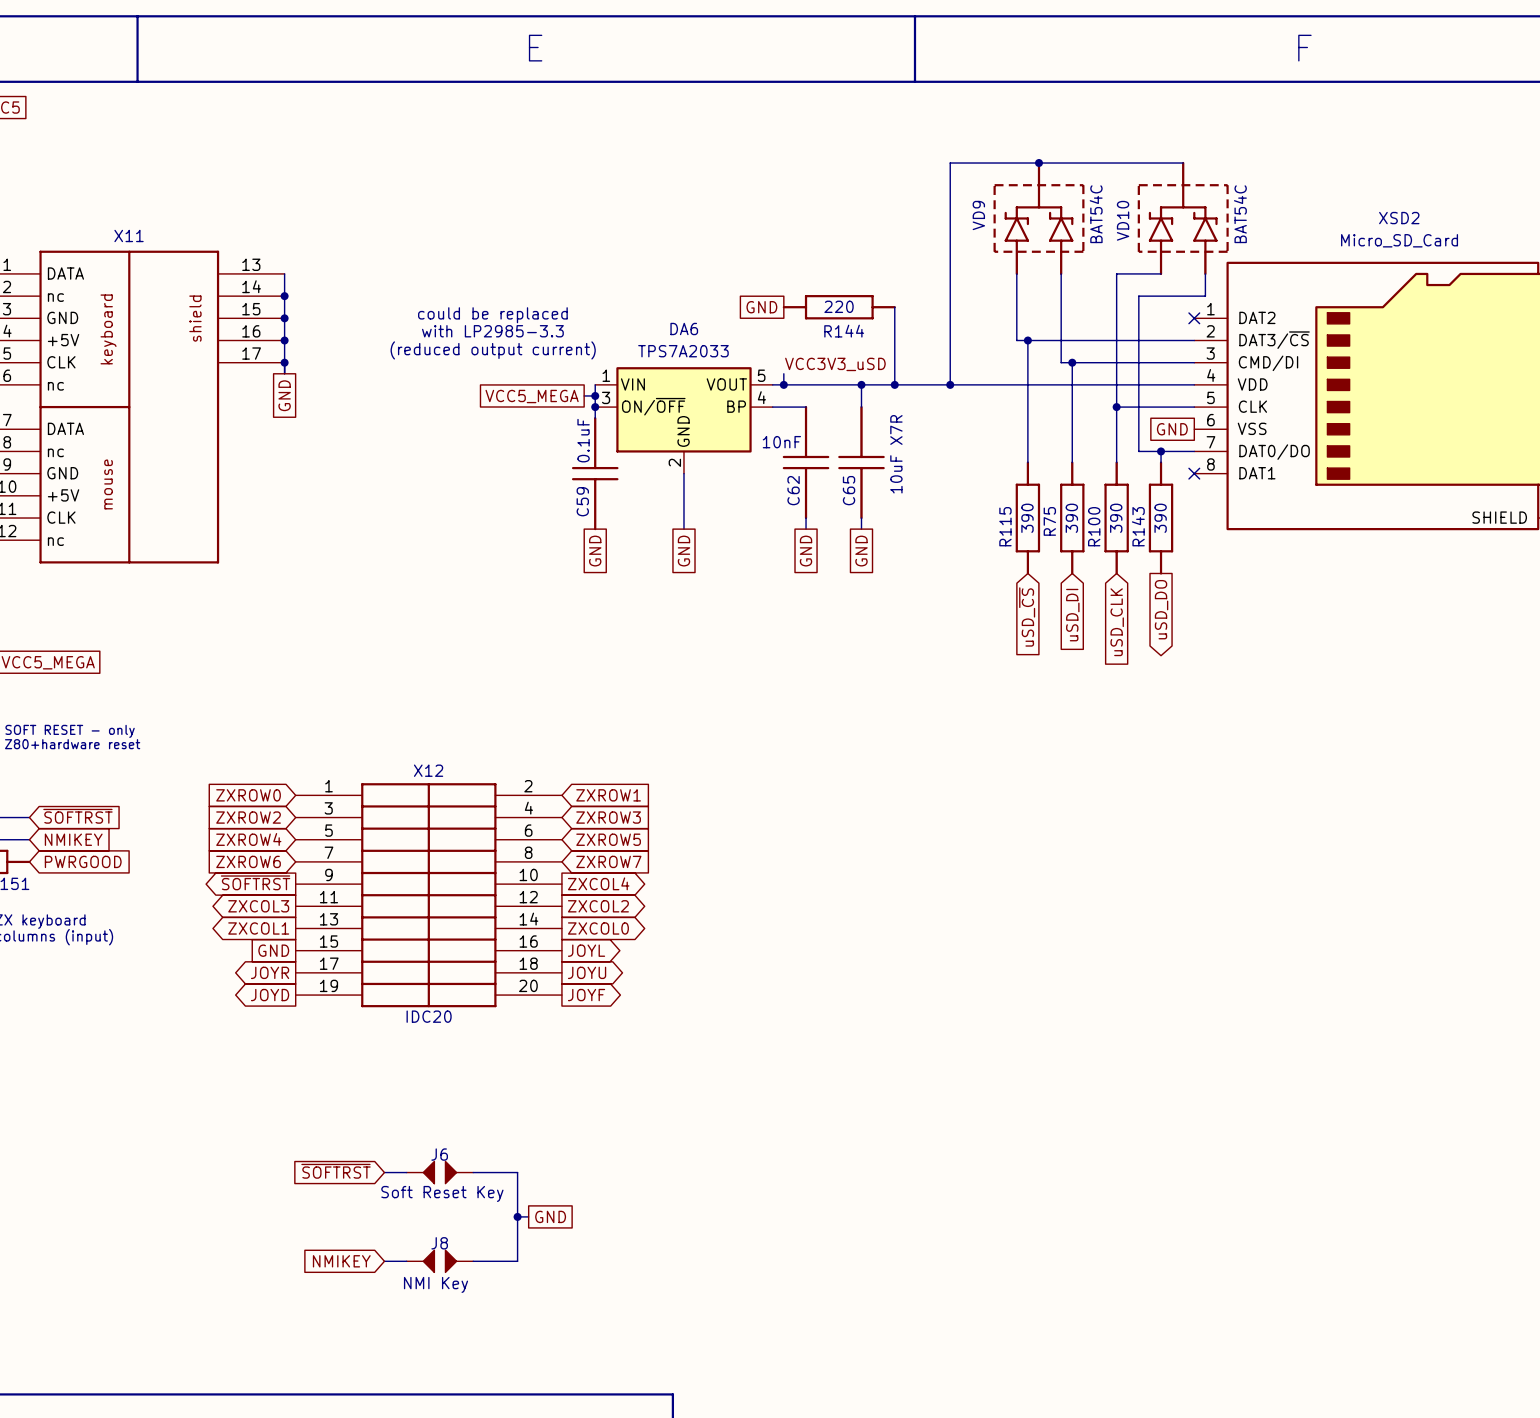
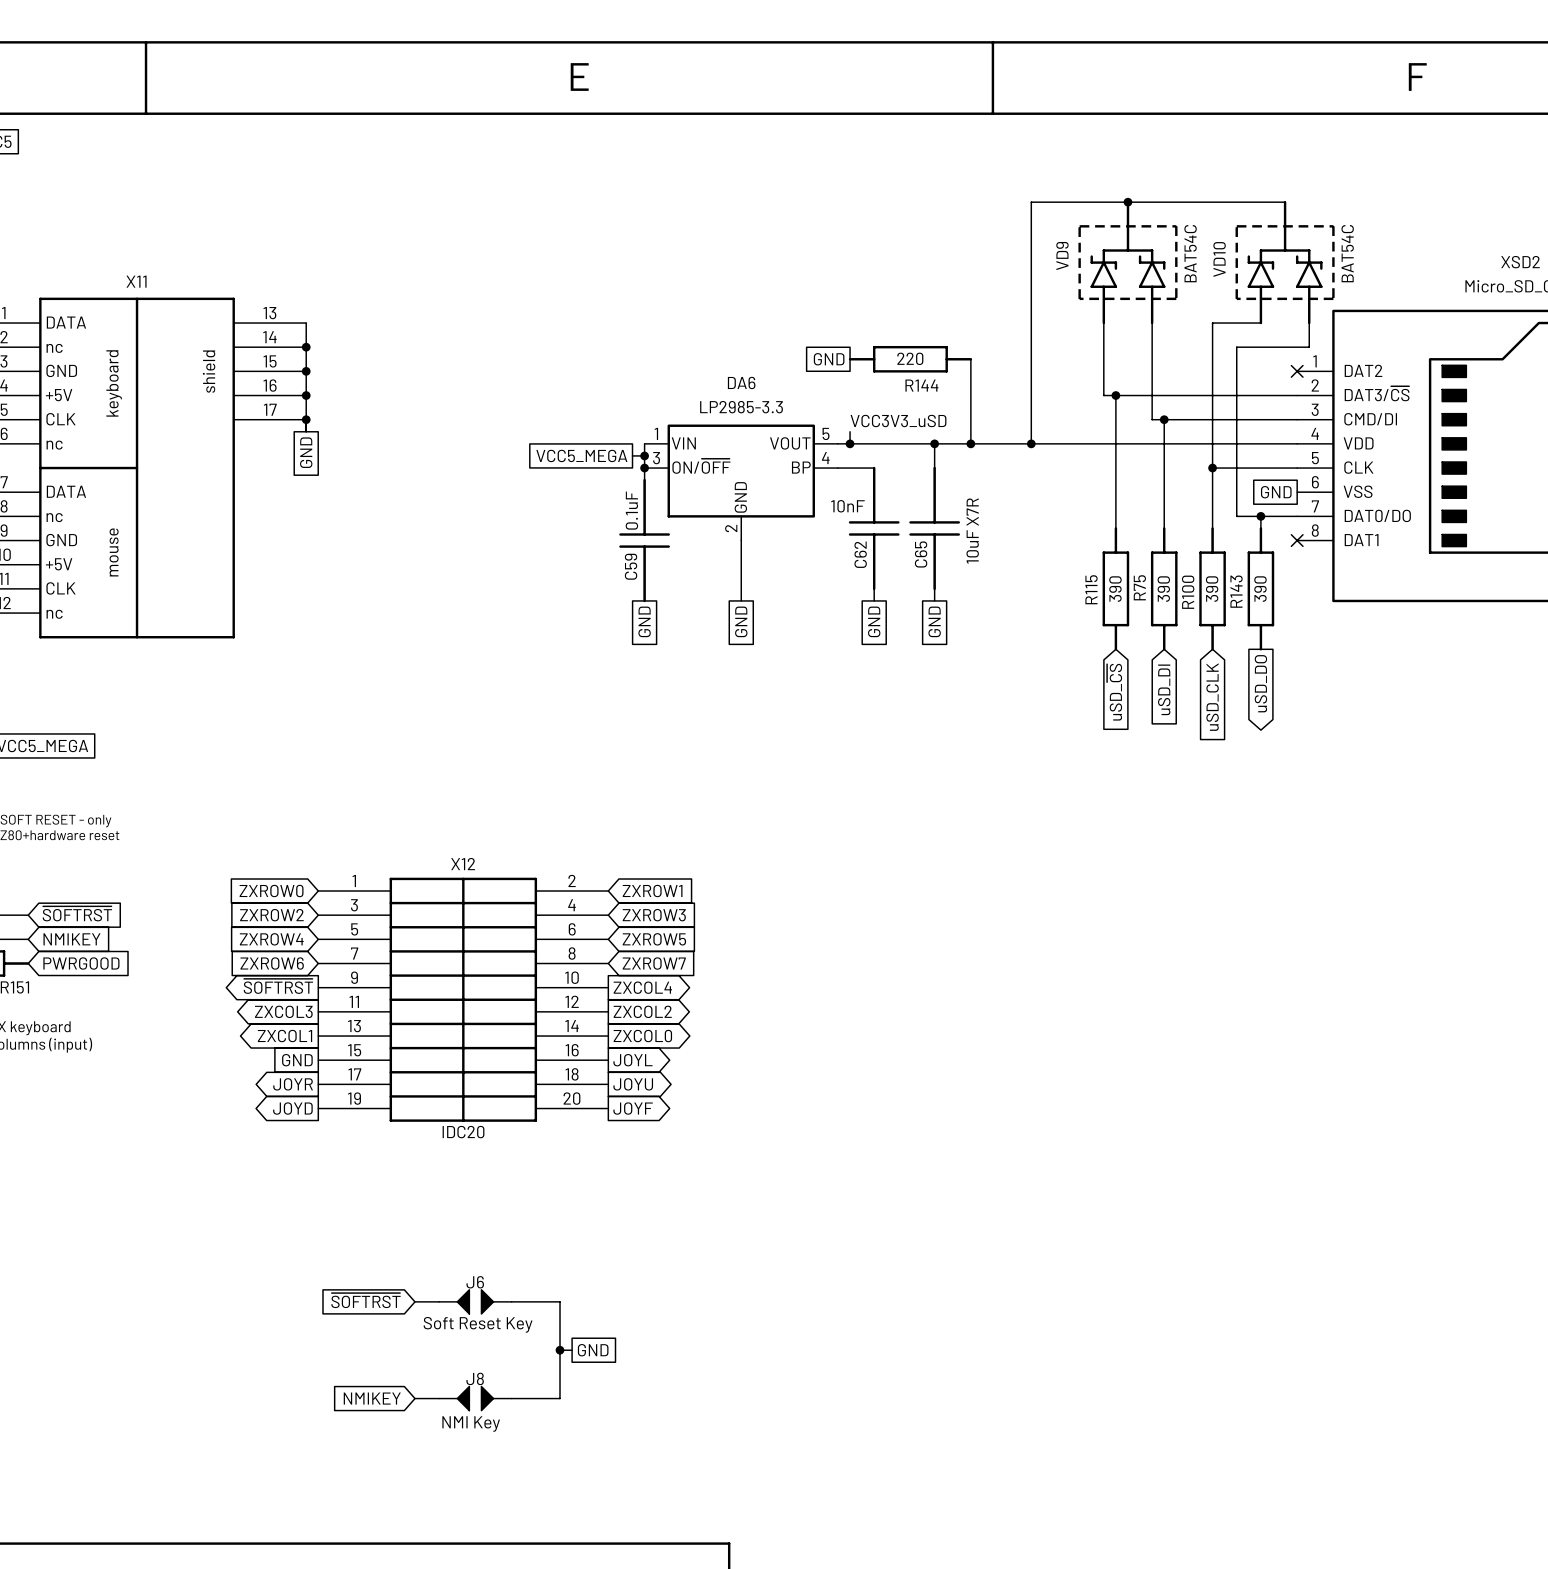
text: could be replaced (492, 315) -> none
text: with LP2985-3.3 (492, 331) -> none
text: (reduced output current) (493, 350) -> none
DA6 value: TPS7A2033 (683, 351) -> LP2985-3.3 (741, 407)

